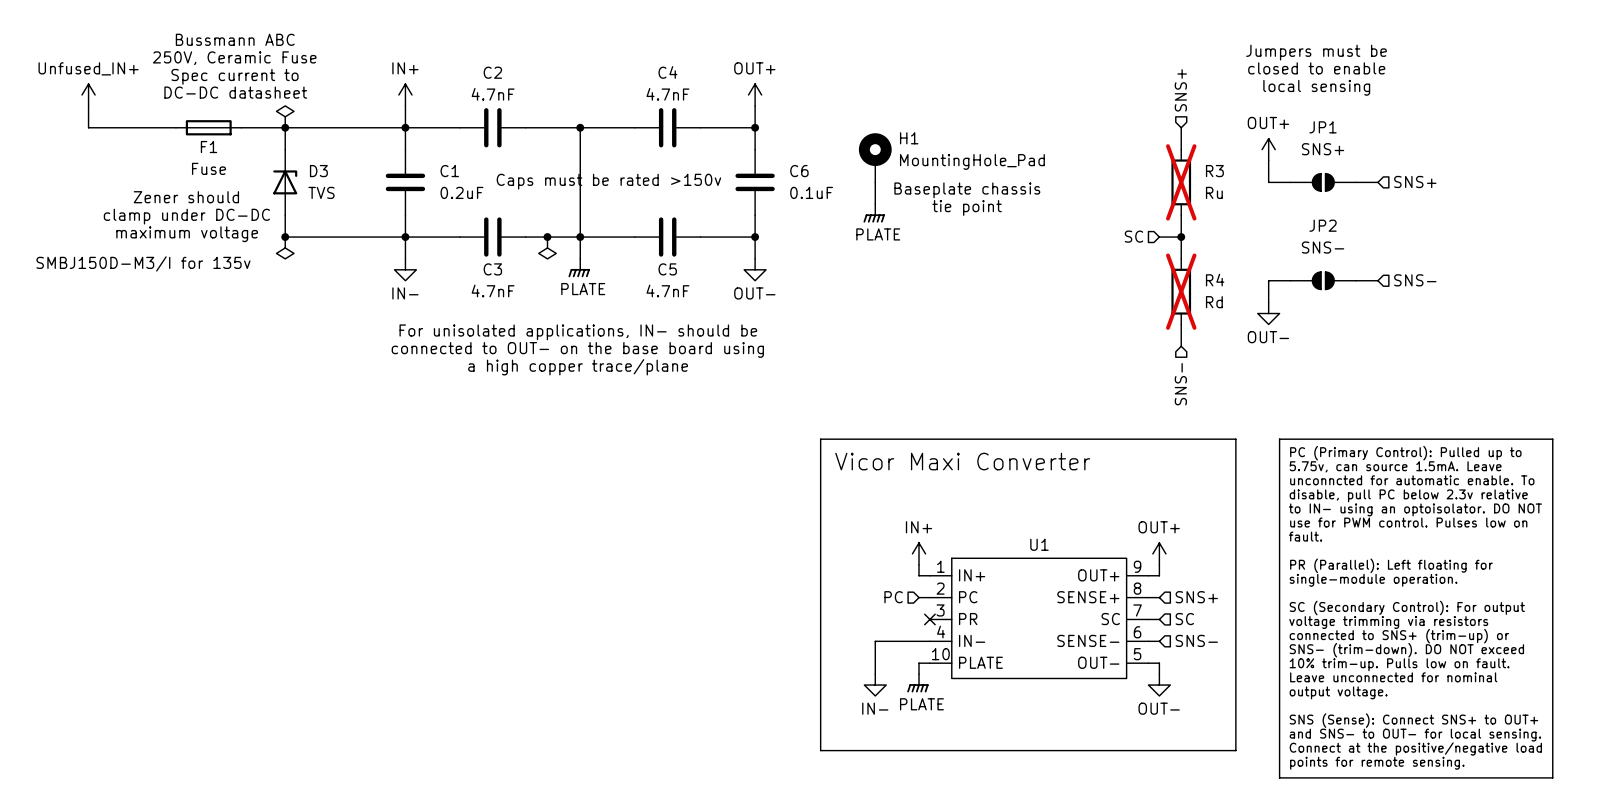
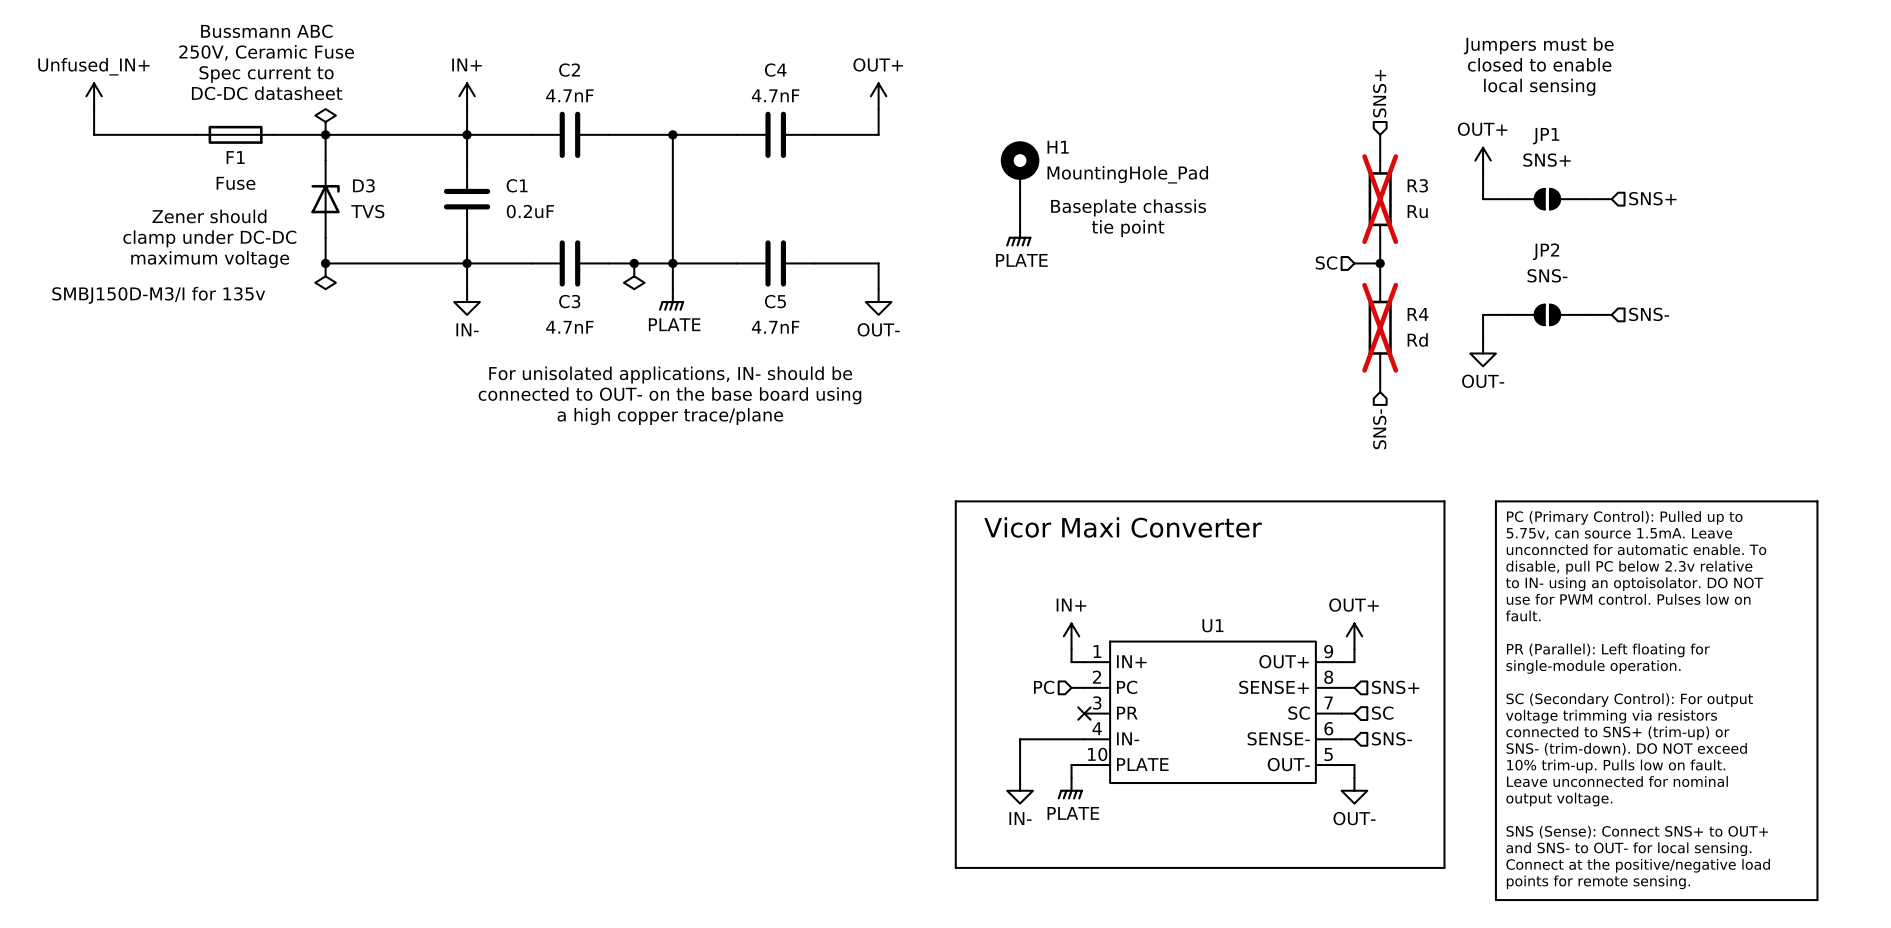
wire: (755, 127) (755, 149) -> none
junction: (755, 127) -> none
text: Caps must be rated >150v (608, 181) -> none
C6: 0.1uF (755, 182) -> none
wire: (755, 215) (755, 237) -> none
junction: (755, 237) -> none

